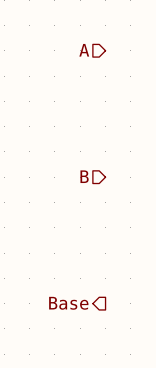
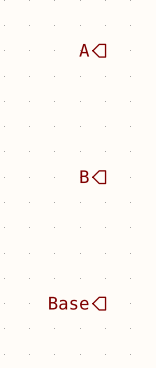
hierarchical label shape: input (84, 50) -> output (84, 50)
hierarchical label shape: input (84, 176) -> output (84, 176)

